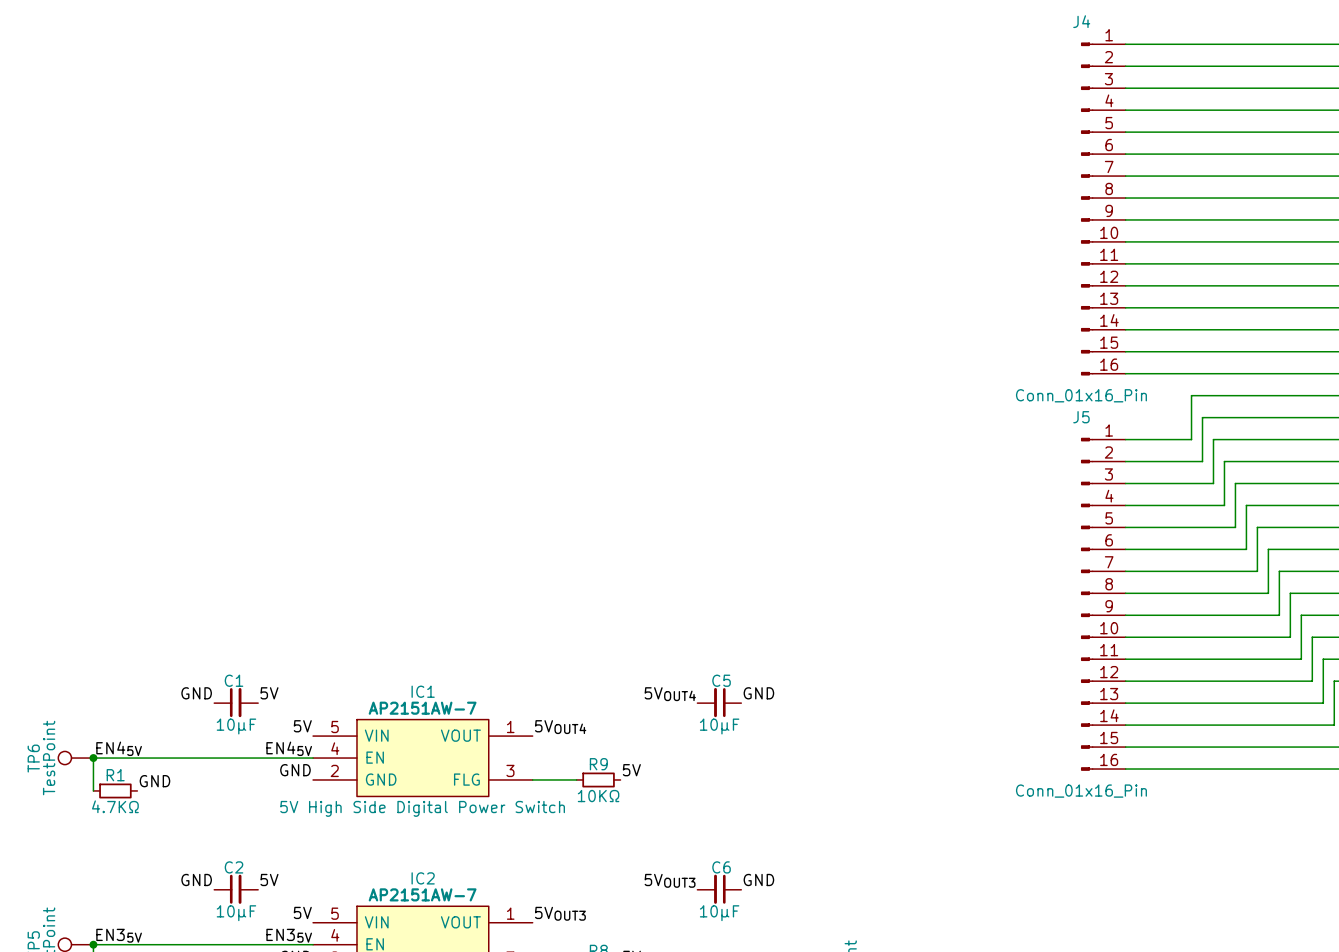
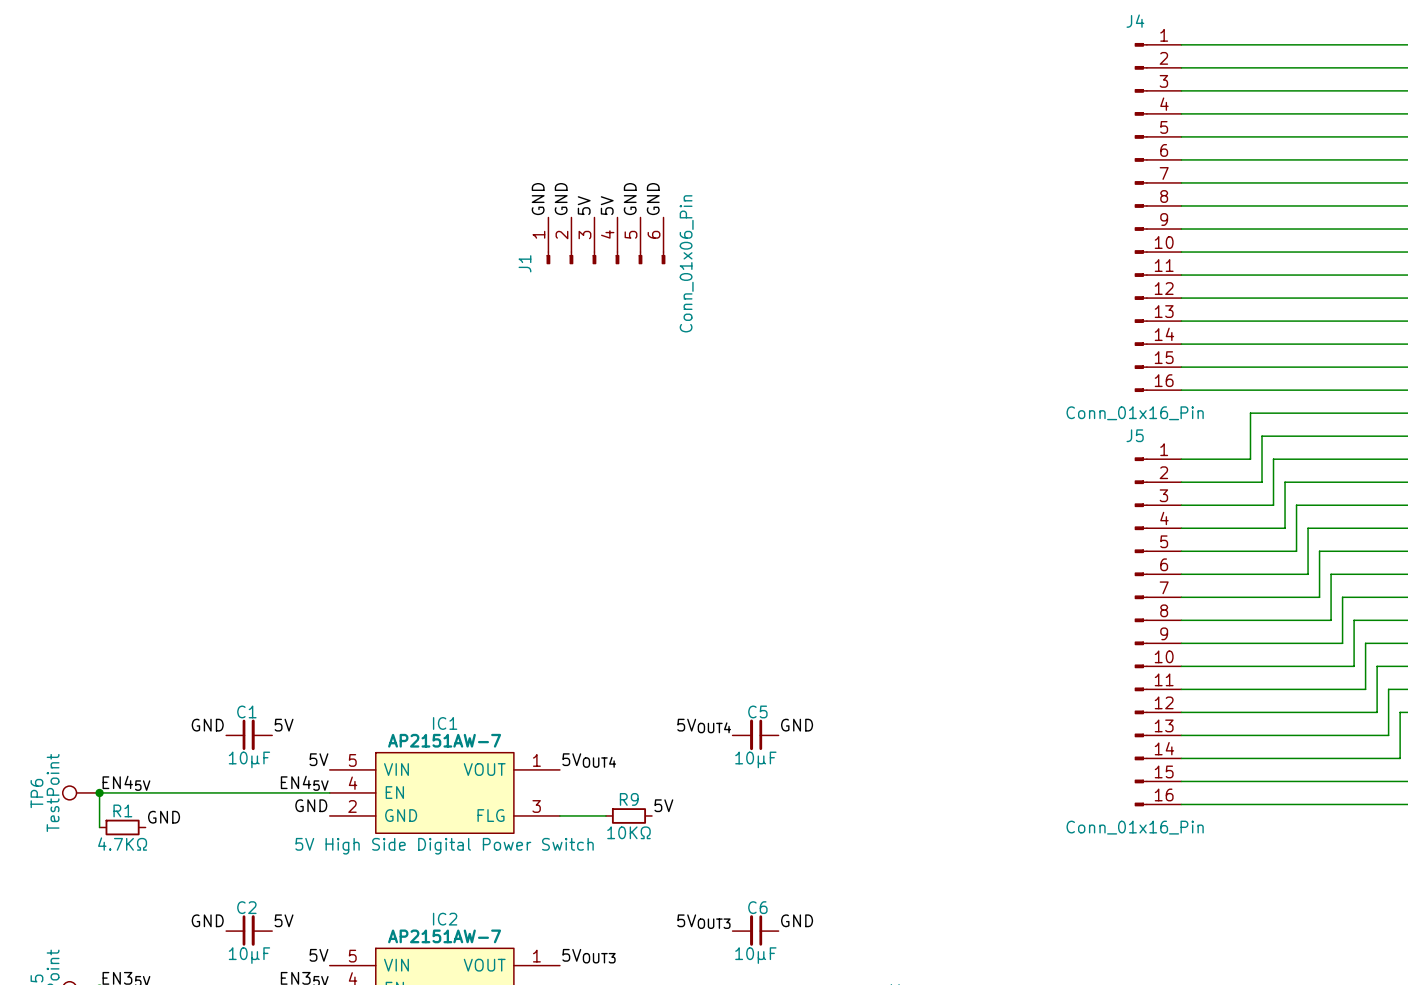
label: none -> GND (538, 199)
label: none -> GND (561, 199)
label: none -> GND (630, 199)
label: none -> GND (653, 199)
label: none -> 5V (584, 205)
label: none -> 5V (607, 205)
J1: none -> Conn_01x06_Pin (605, 240)

